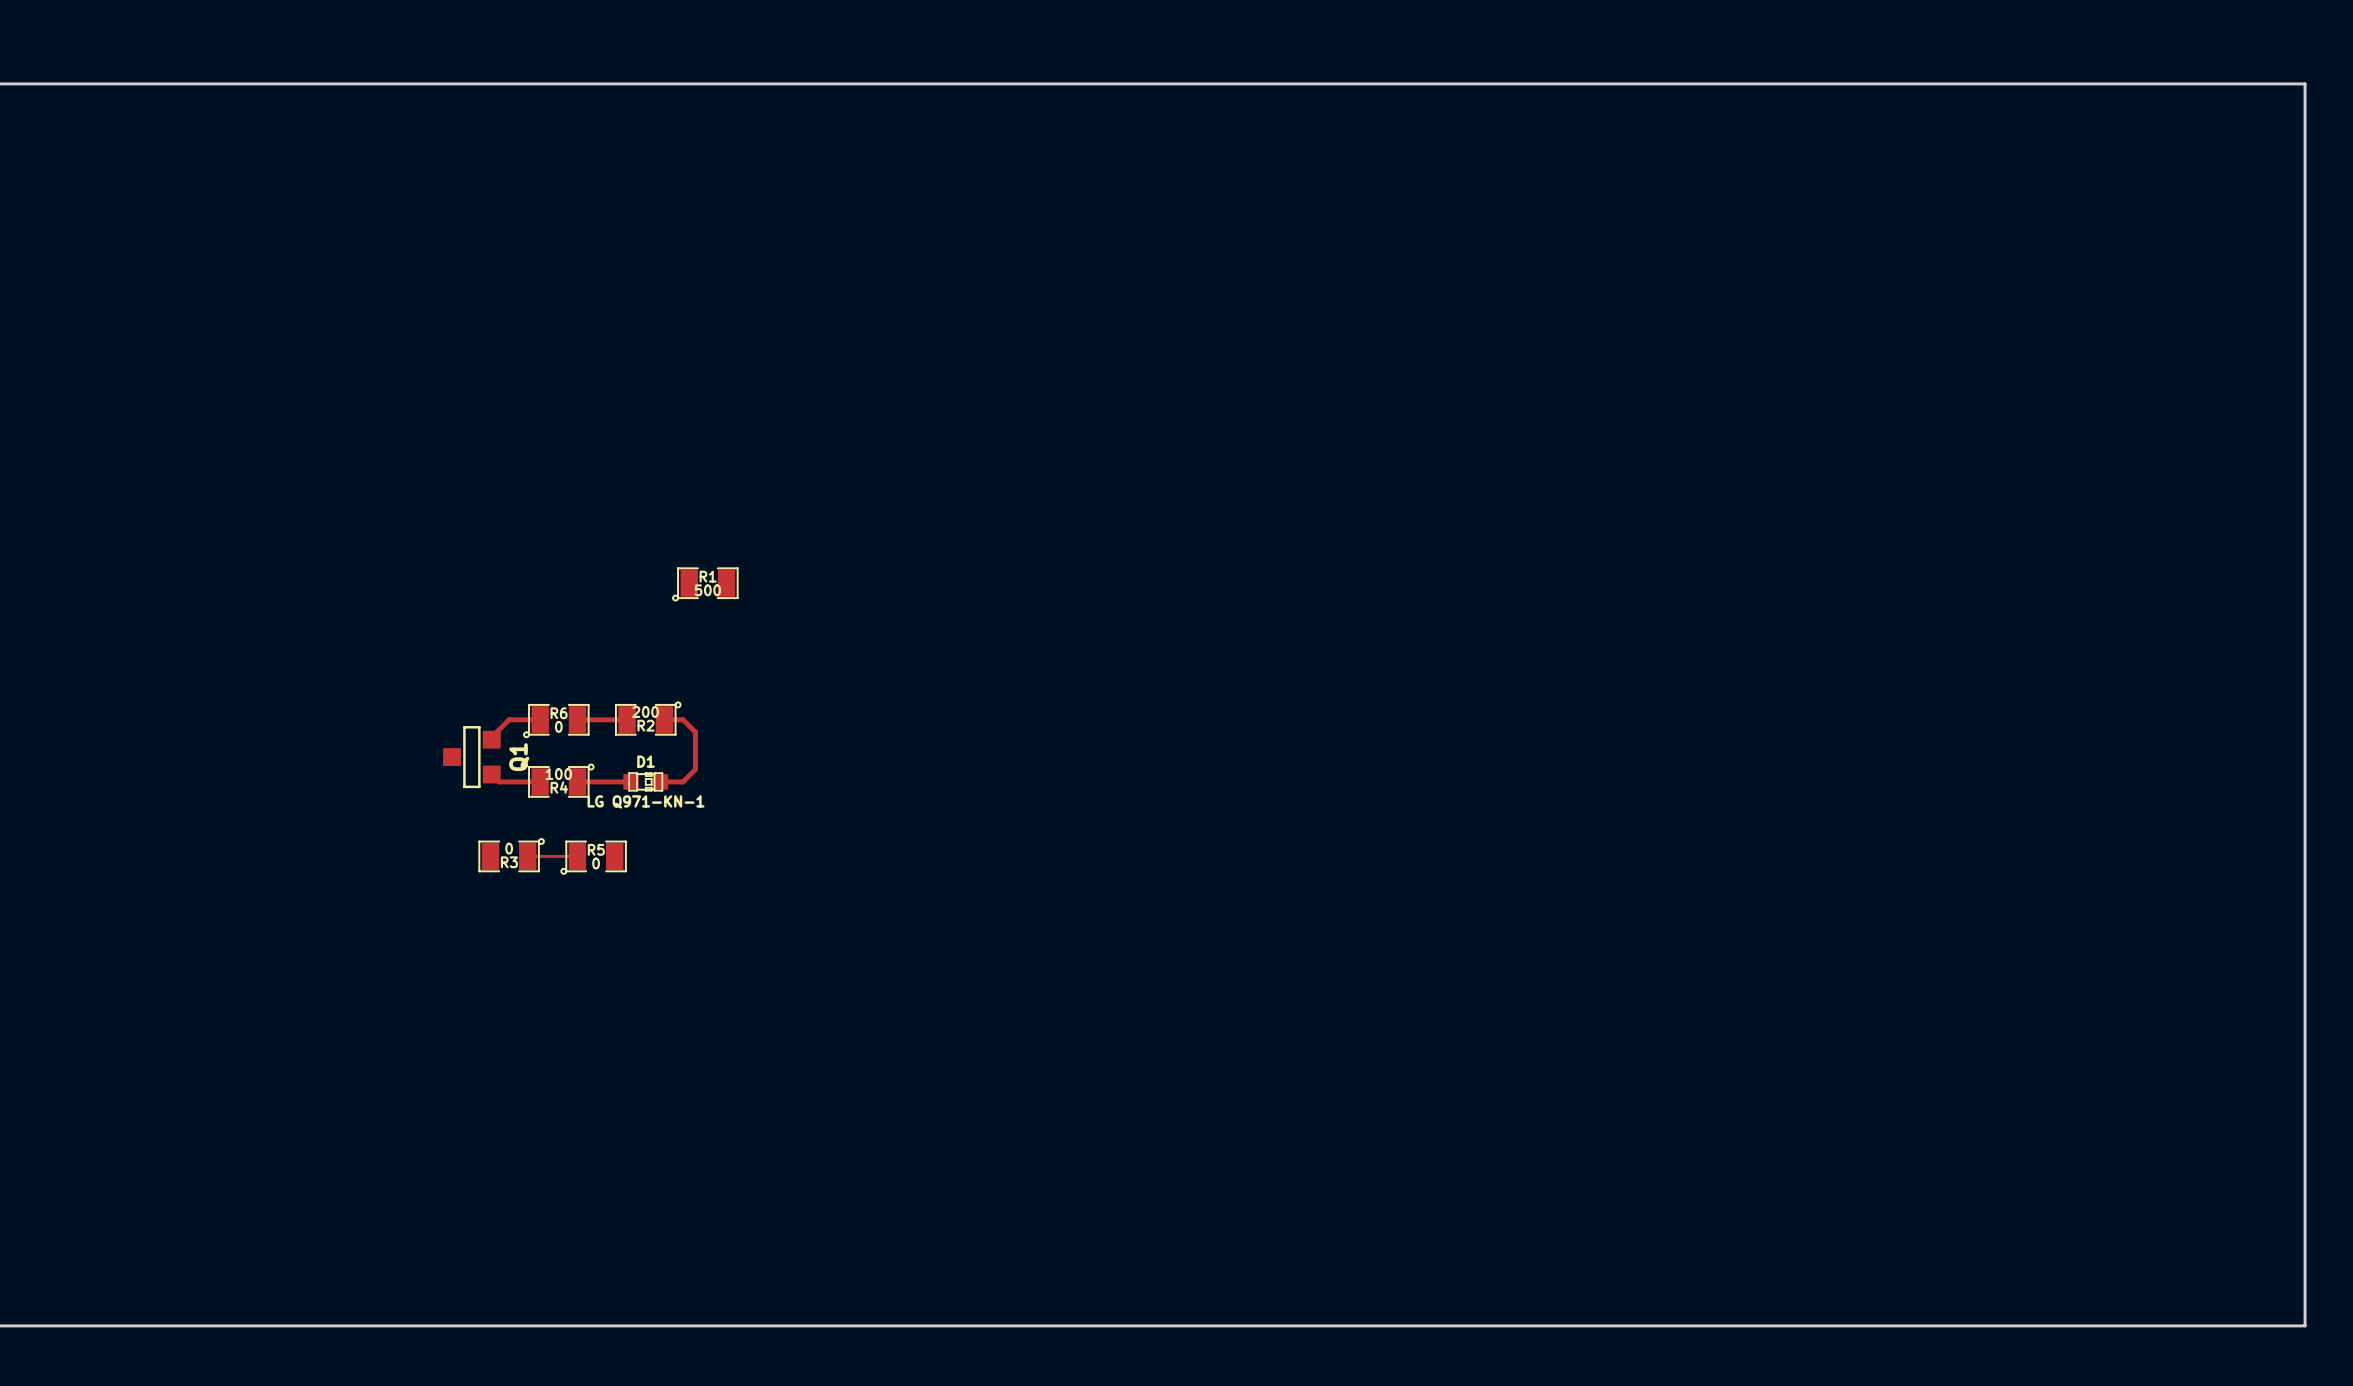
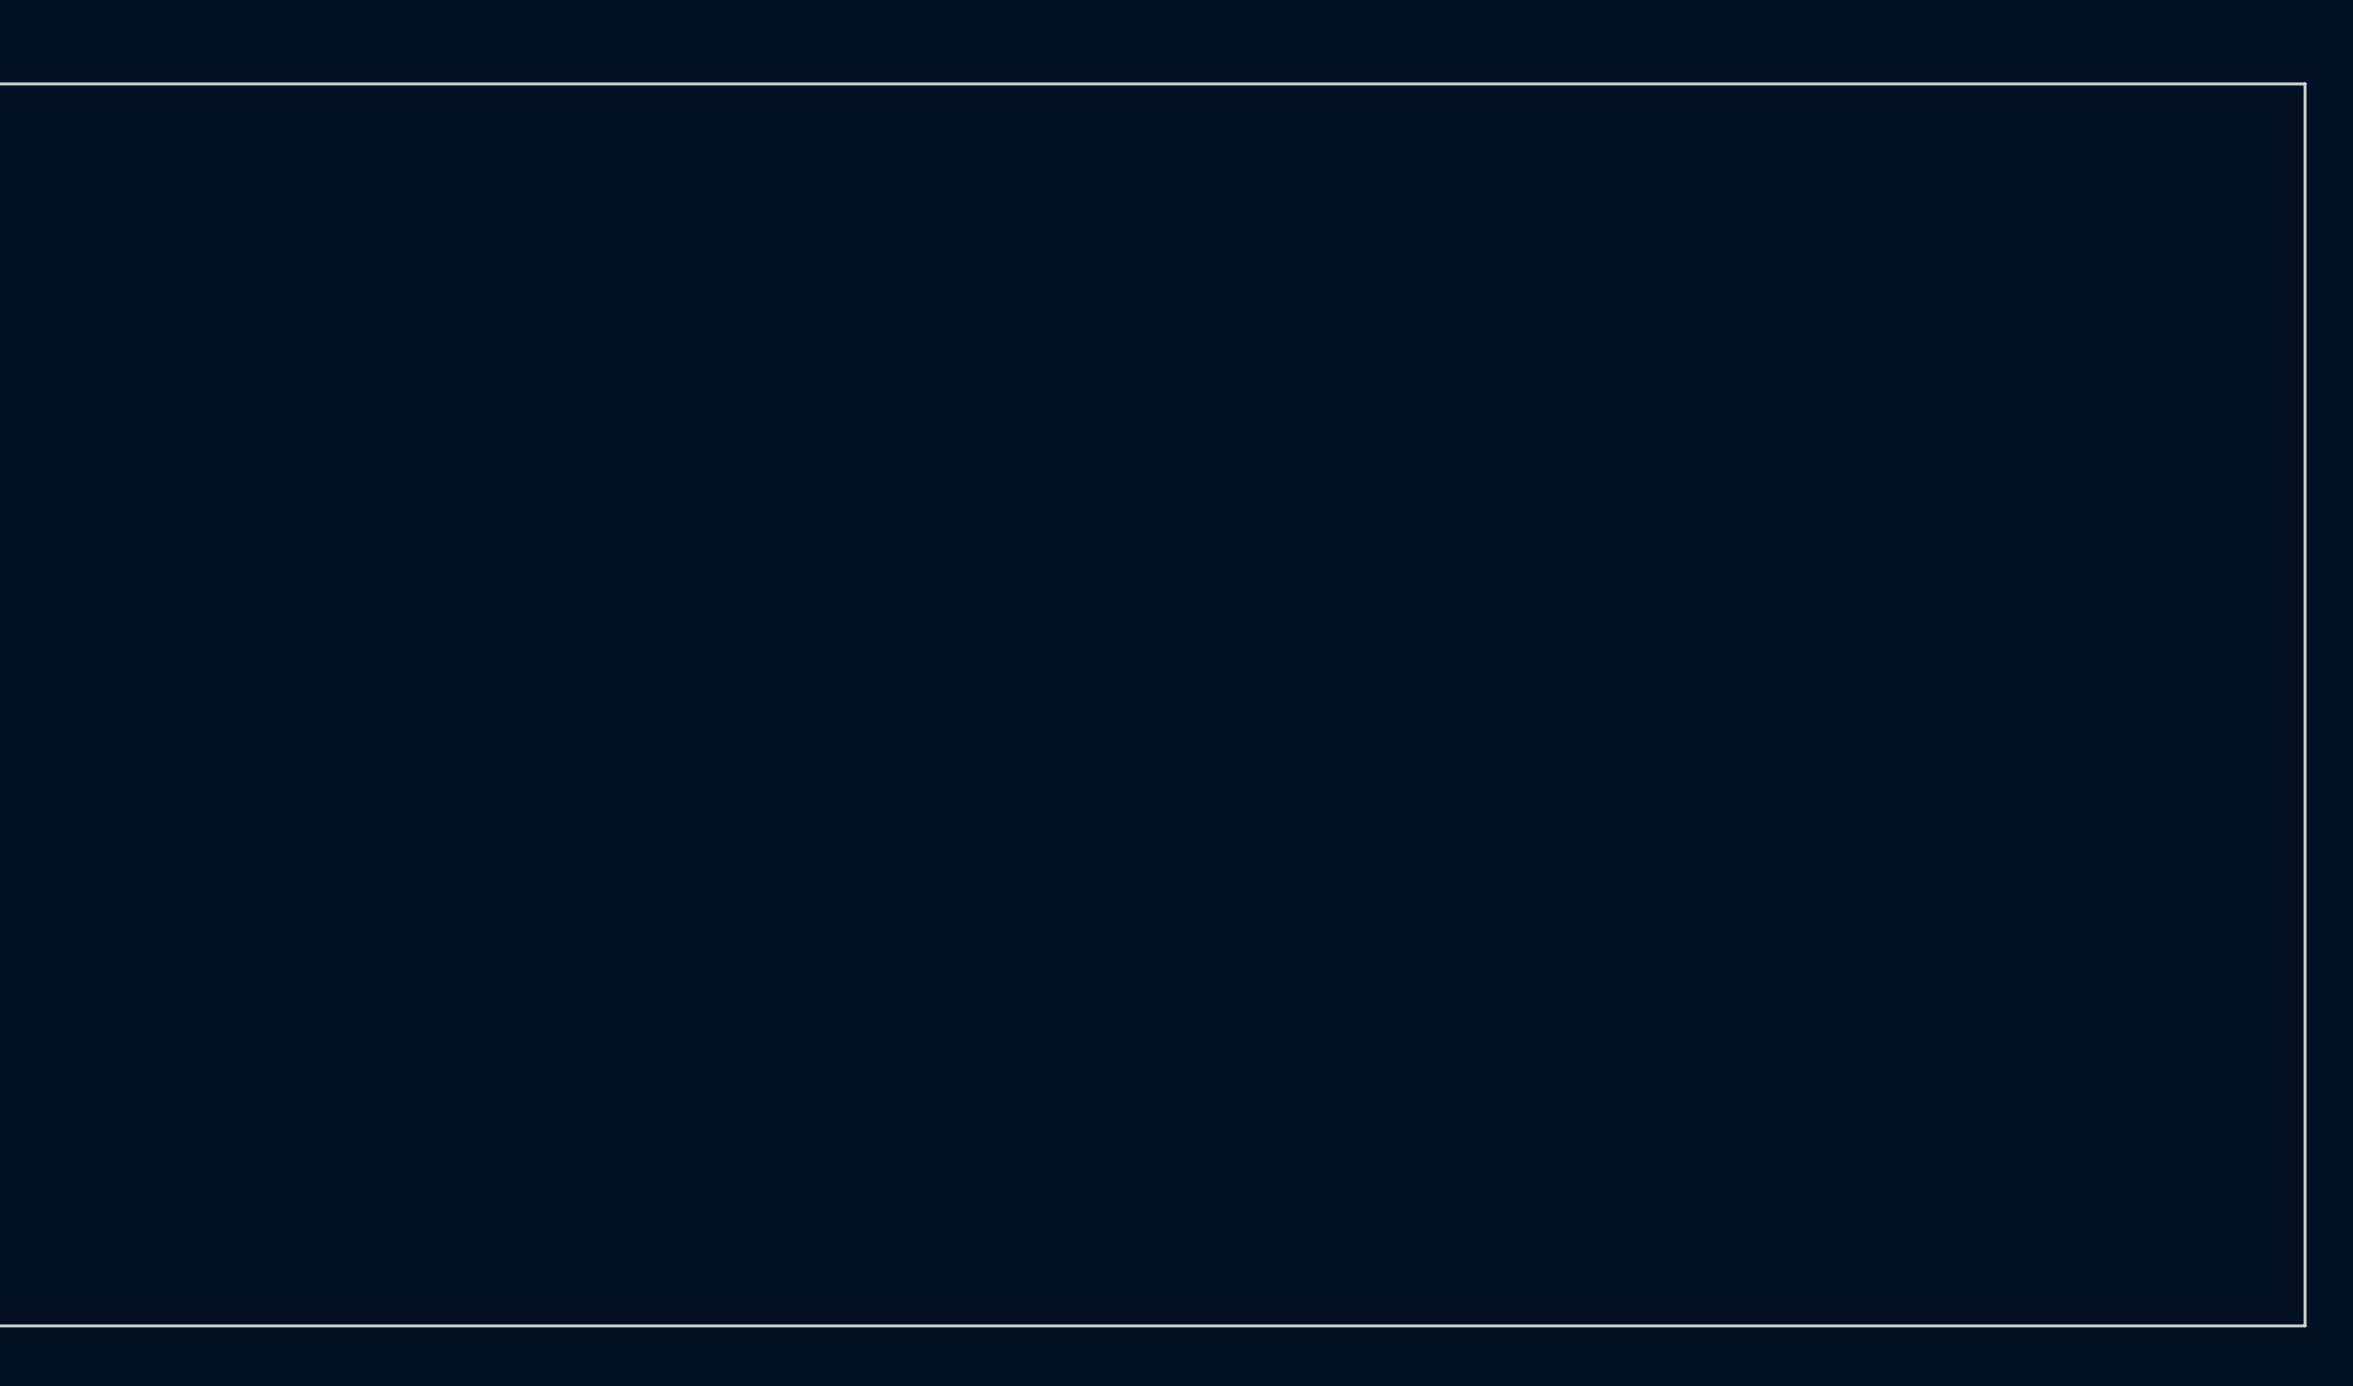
R1: 500 (705, 584) -> none
R2: 200 (648, 718) -> none
top track: (540, 719) (509, 719) (491, 737) (491, 739) -> none
top track: (577, 719) (627, 719) -> none
top track: (664, 719) (683, 719) (695, 732) (695, 769) (683, 781) (660, 781) -> none
R6: 0 (556, 721) -> none
Q1: (471, 757) -> none
top track: (491, 774) (499, 781) (540, 781) -> none
R4: 100 (561, 780) -> none
top track: (577, 781) (631, 781) -> none
D1: LG Q971-KN-1 (645, 781) -> none
R3: 0 (511, 855) -> none
top track: (527, 856) (577, 856) -> none
R5: 0 (593, 857) -> none

